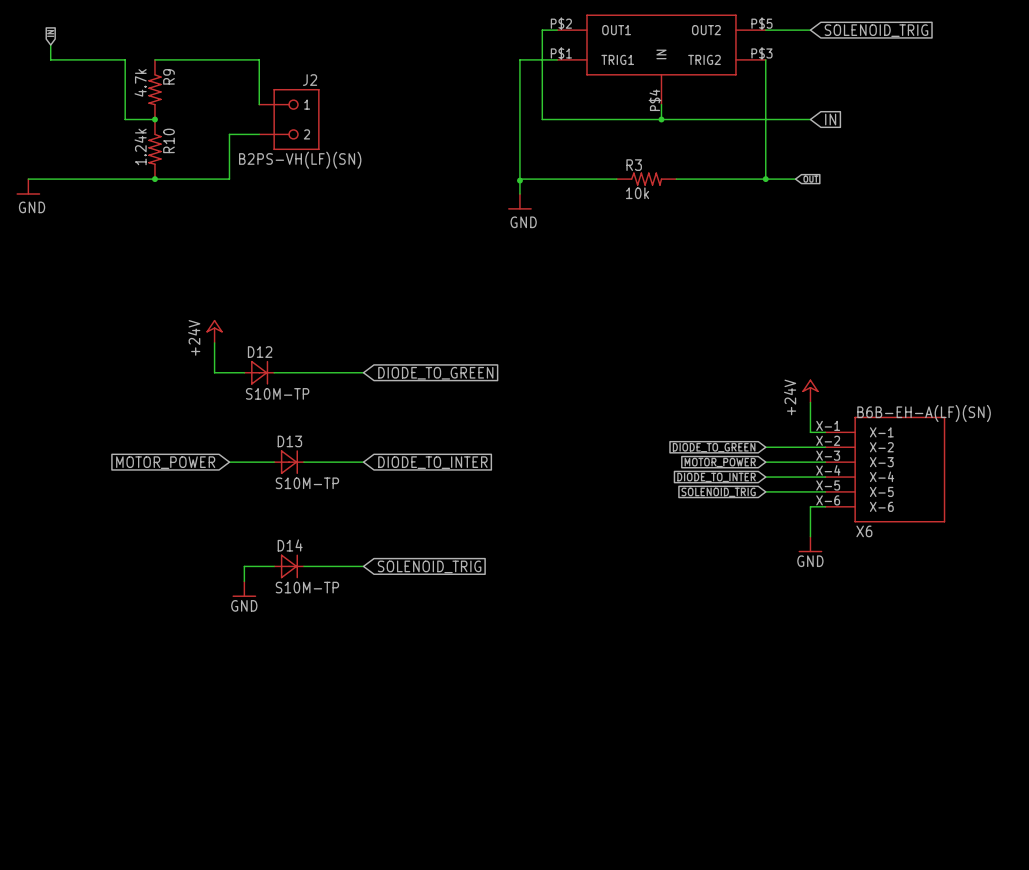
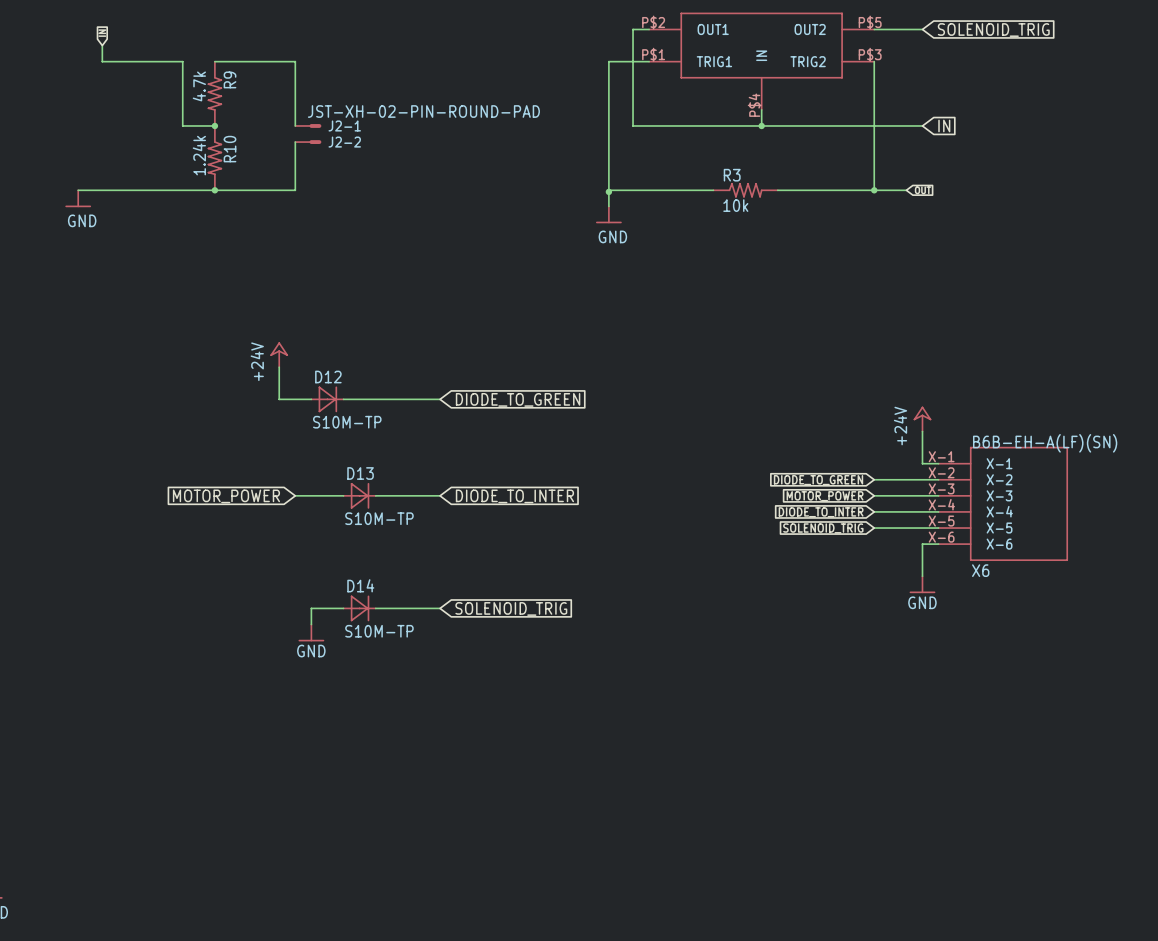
wire: (229, 59) (259, 59) (259, 104) -> (295, 61) (295, 125)
J2-1: none -> JST-XH-02-PIN-ROUND-PAD (308, 125)
J2: B2PS-VH(LF)(SN) (289, 119) -> none
J2-2: none -> (308, 142)

